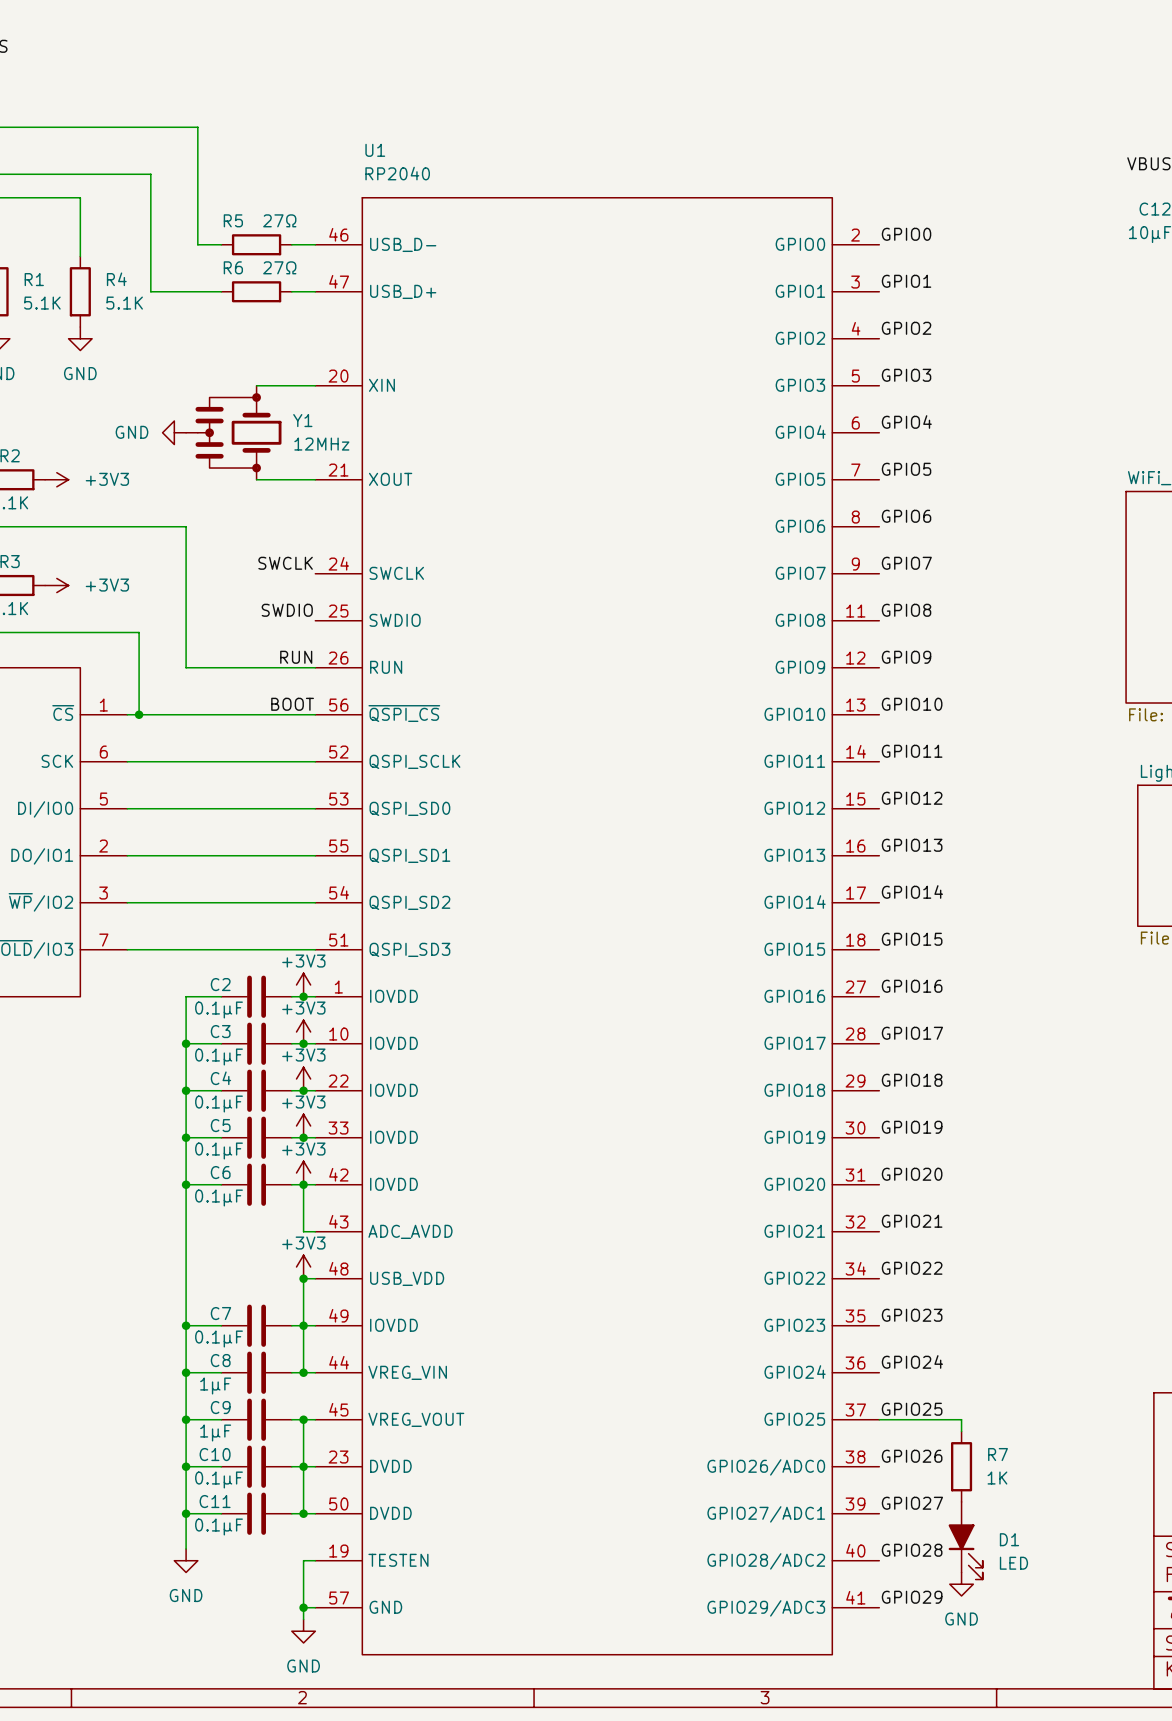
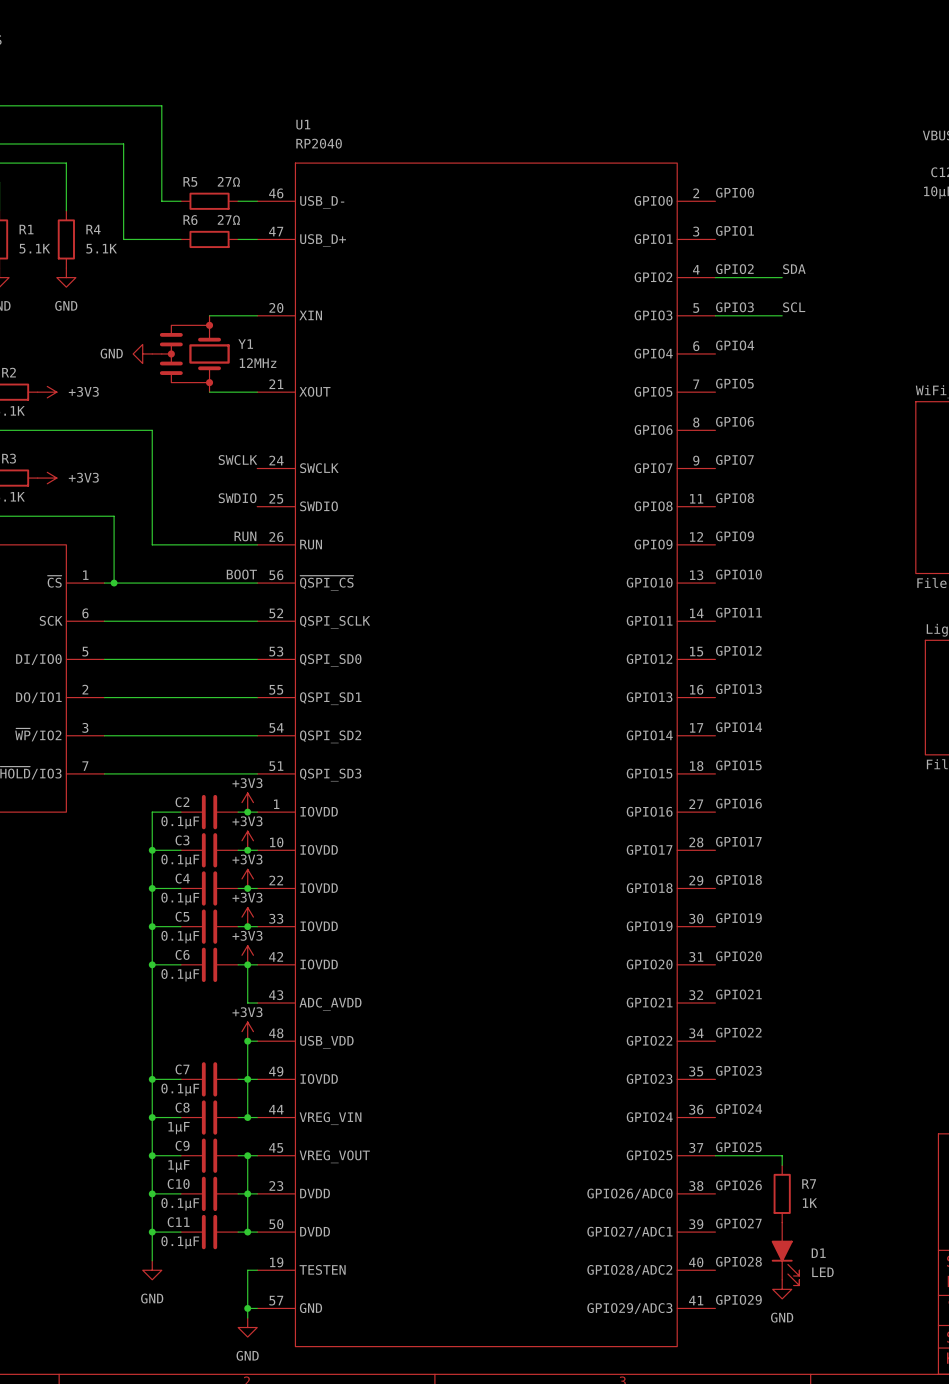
label: none -> SDA (794, 269)
wire: none -> (715, 277) (782, 277)
label: none -> SCL (794, 307)
wire: none -> (715, 315) (782, 315)

